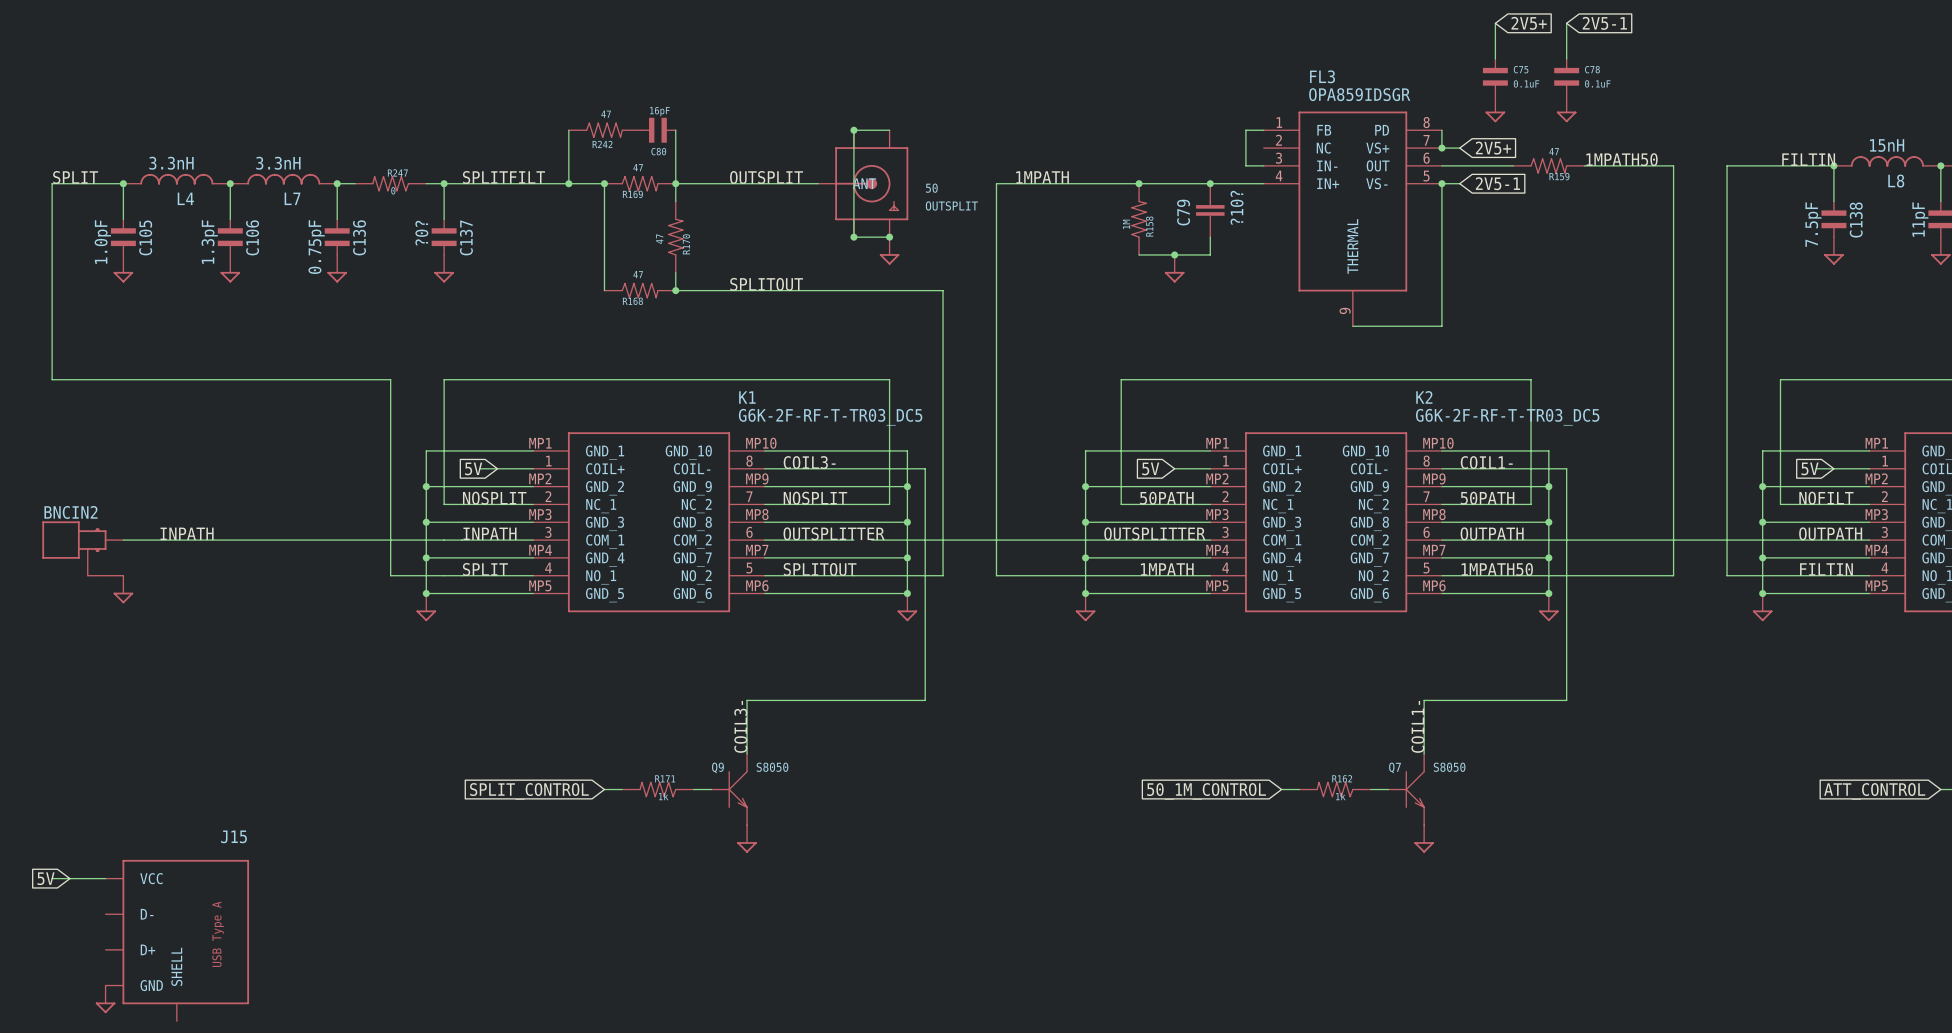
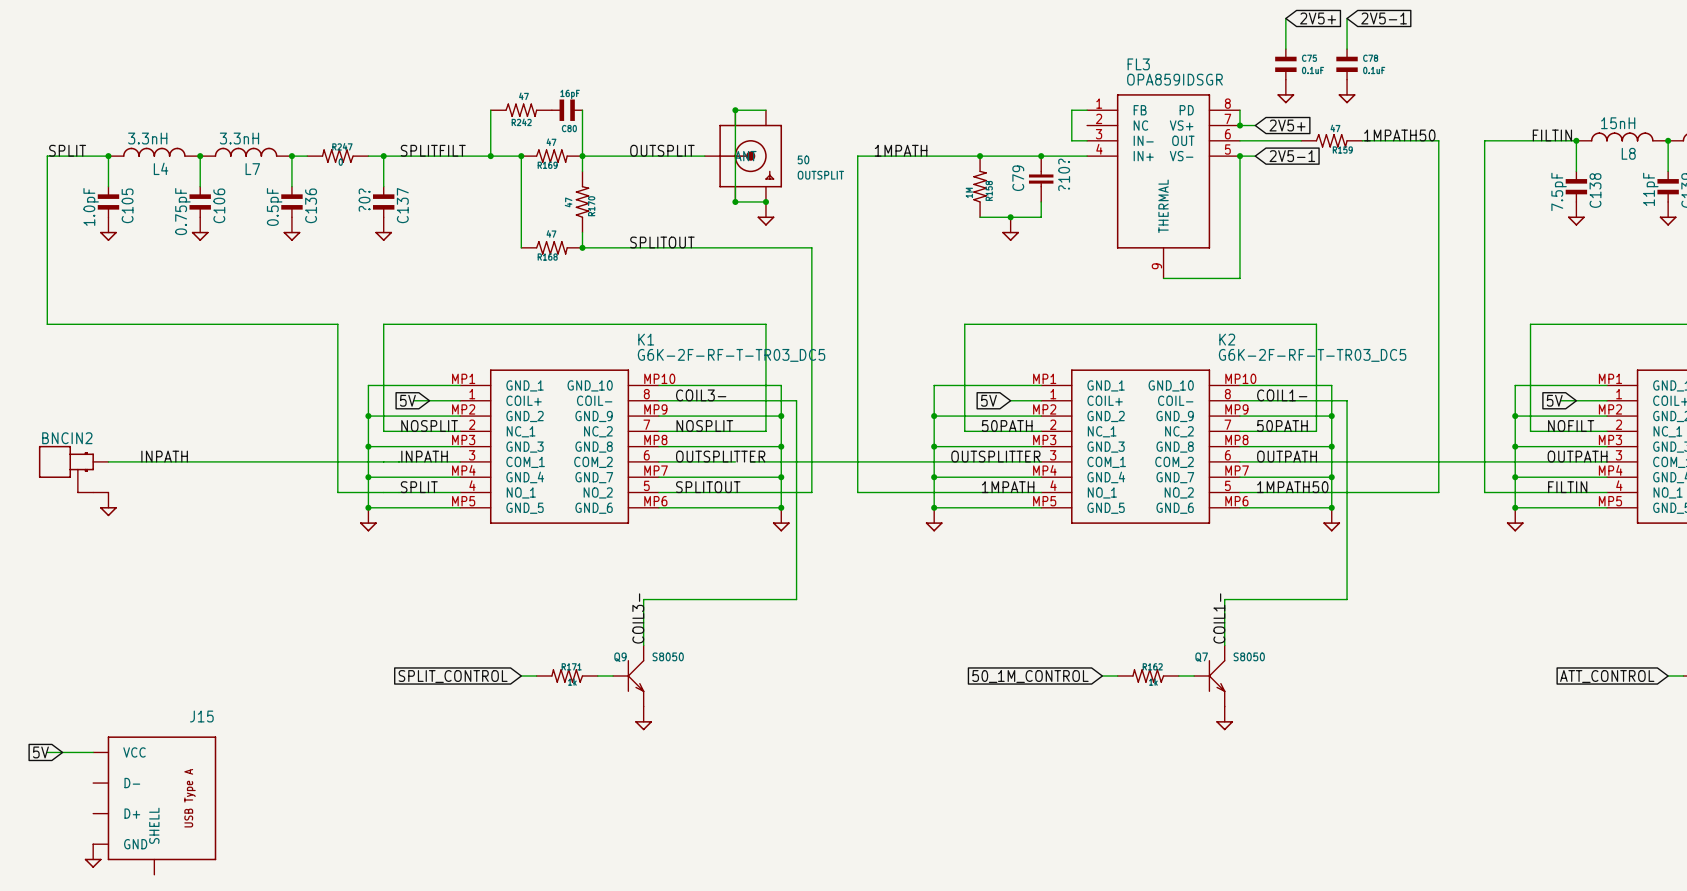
C106 value: 1.3pF (209, 242) -> 0.75pF (182, 211)
C136 value: 0.75pF (316, 247) -> 0.5pF (274, 206)

